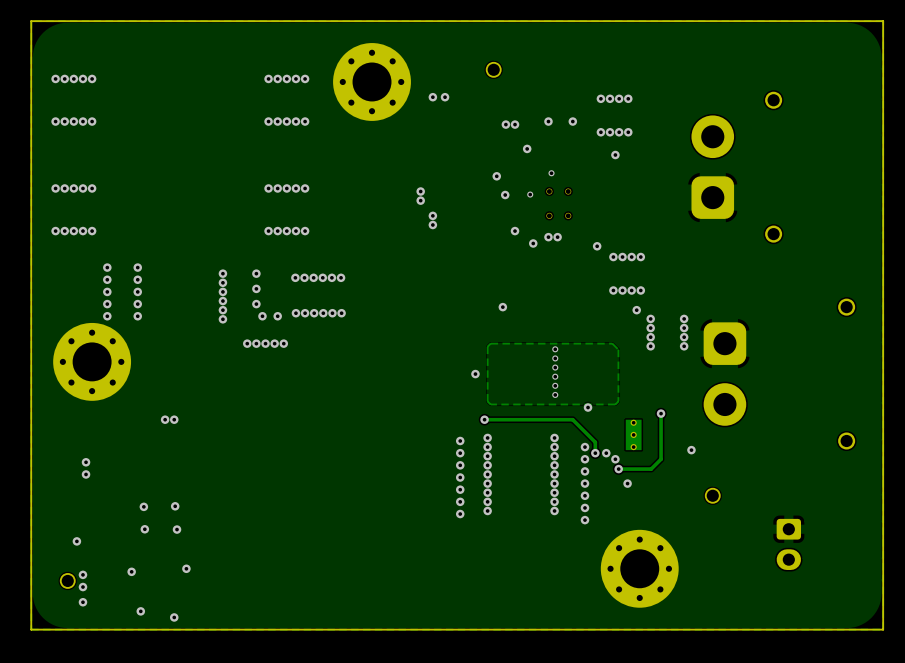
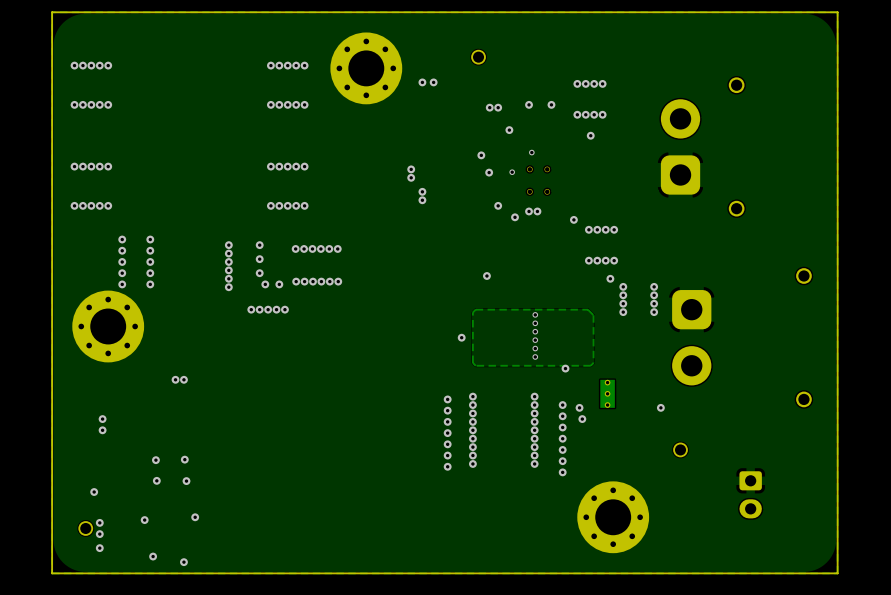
track: (661, 413) (661, 459) (651, 469) (618, 469) -> none
via: (661, 413) -> none
track: (484, 419) (572, 419) (595, 442) (595, 453) -> none
via: (484, 419) -> none
via: none -> (579, 407)
via: (595, 453) -> none
via: (606, 453) -> none
via: (615, 459) -> none
via: none -> (582, 419)
via: (618, 469) -> none
via: (627, 483) -> none

